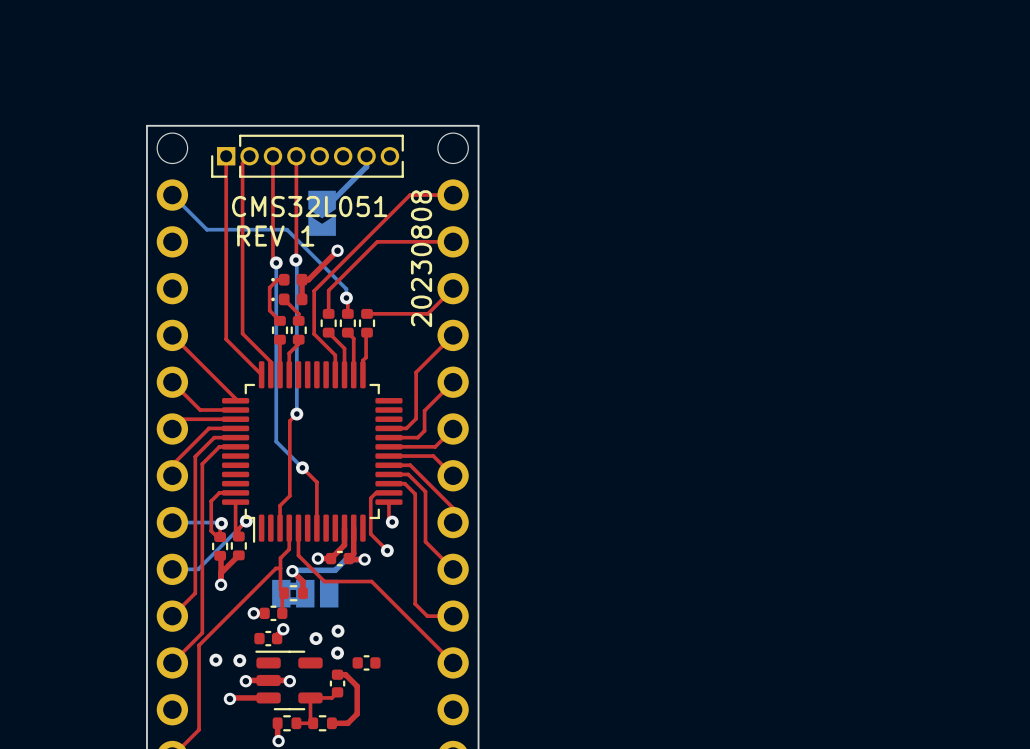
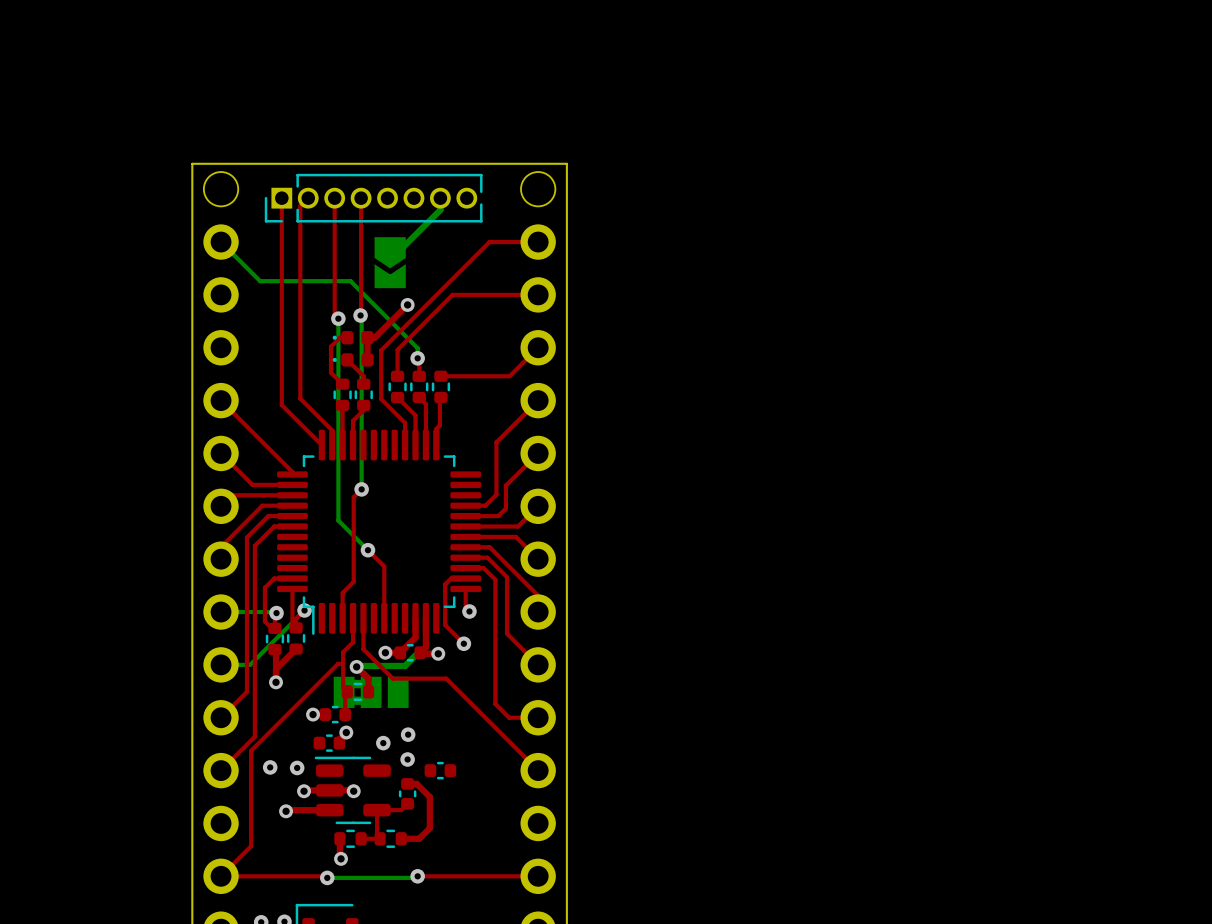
text: CMS32L051 (309, 206) -> none
text: REV 1 (275, 236) -> none
text: 20230808 (421, 258) -> none

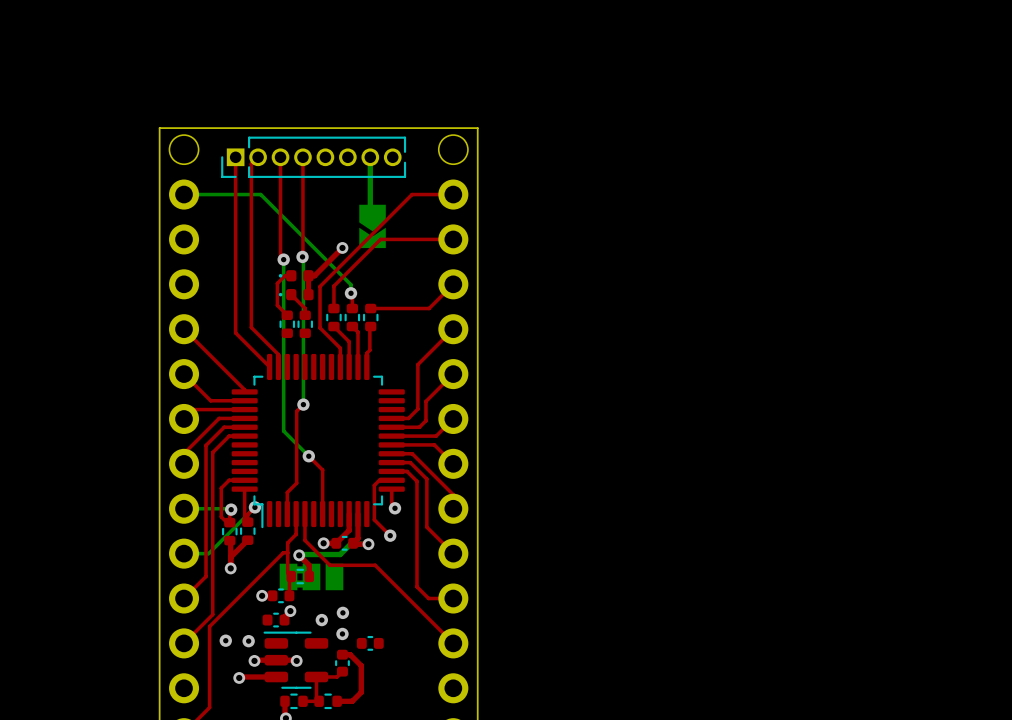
bottom track: (440, 210) (394, 256) -> (370, 167) (370, 211) (372, 213)
bottom track: (221, 242) (260, 281) (350, 281) -> (184, 194) (260, 194) (293, 227)
part position: (390, 262) -> (372, 226)
top track: (342, 405) (342, 445) -> none
top track: (363, 405) (363, 410) (353, 420) (353, 445) -> none

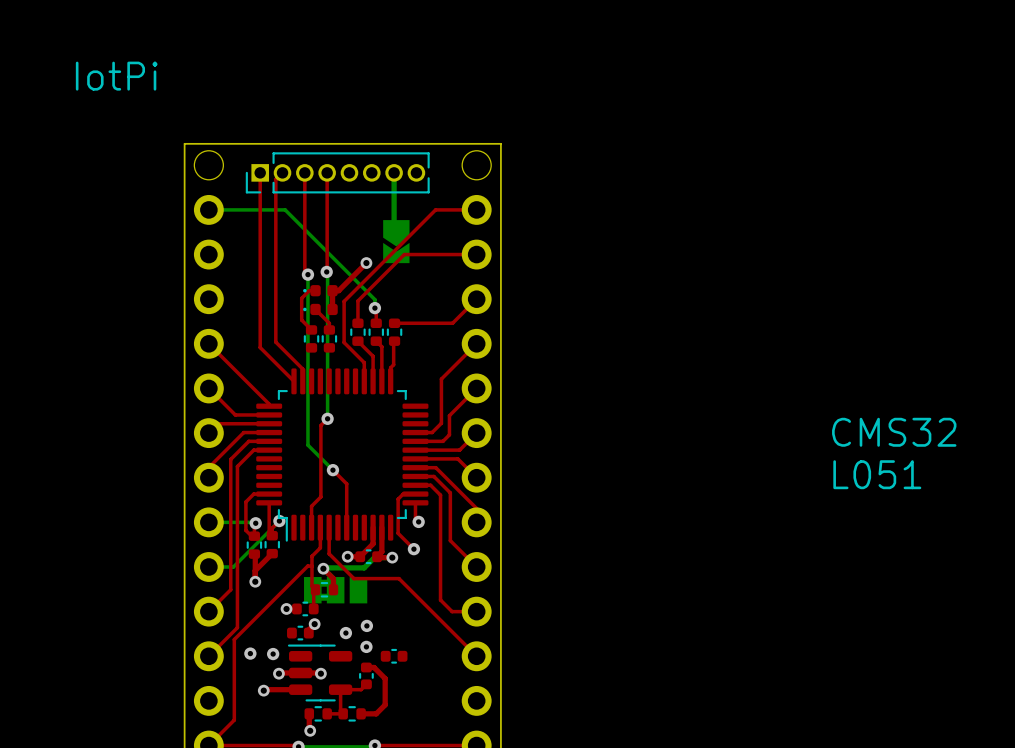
text: none -> IotPi (116, 76)
text: none -> CMS32 (894, 432)
text: none -> L051 (877, 474)

